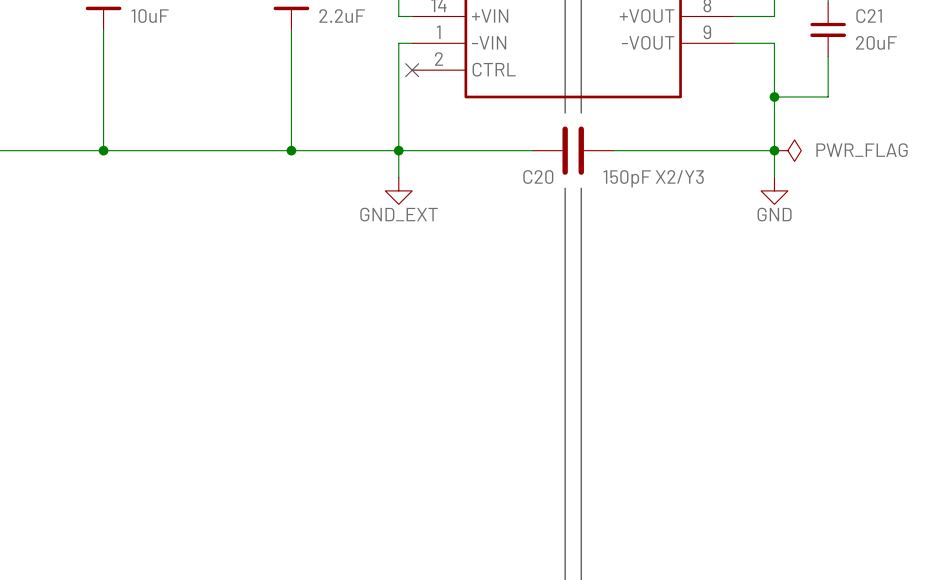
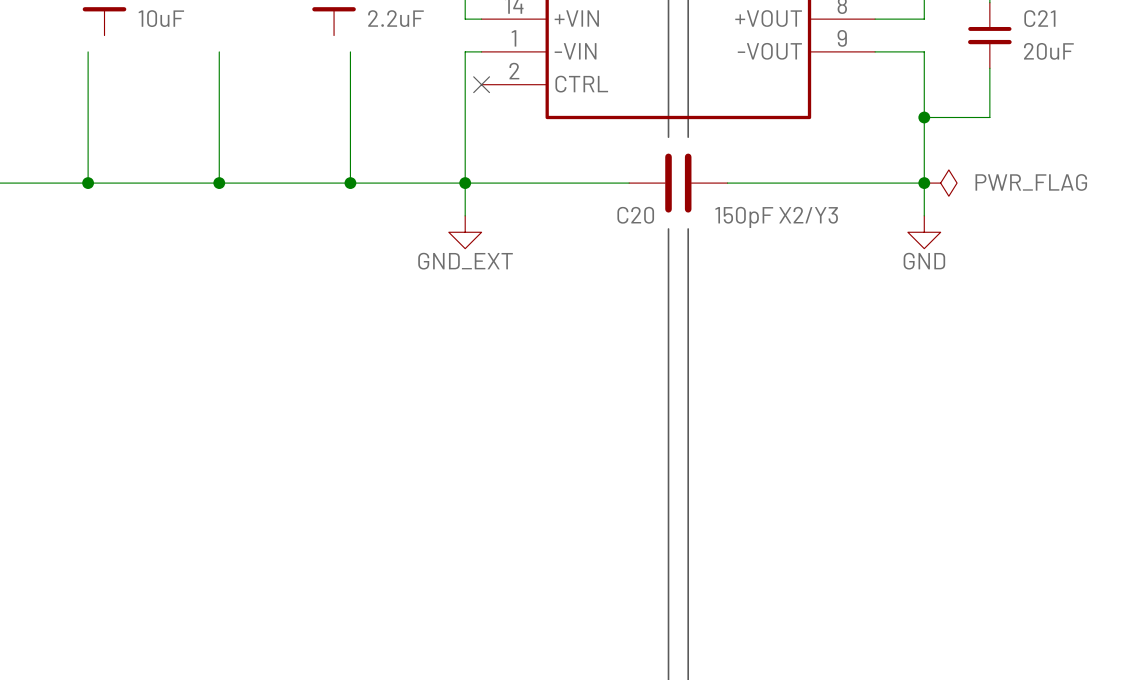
wire: (103, 29) (103, 150) -> none
wire: (291, 29) (291, 150) -> none
wire: none -> (88, 51) (88, 183)
wire: none -> (219, 51) (219, 183)
wire: none -> (350, 51) (350, 183)
junction position: (103, 150) -> (88, 183)
junction: none -> (219, 183)
junction position: (291, 150) -> (350, 183)

